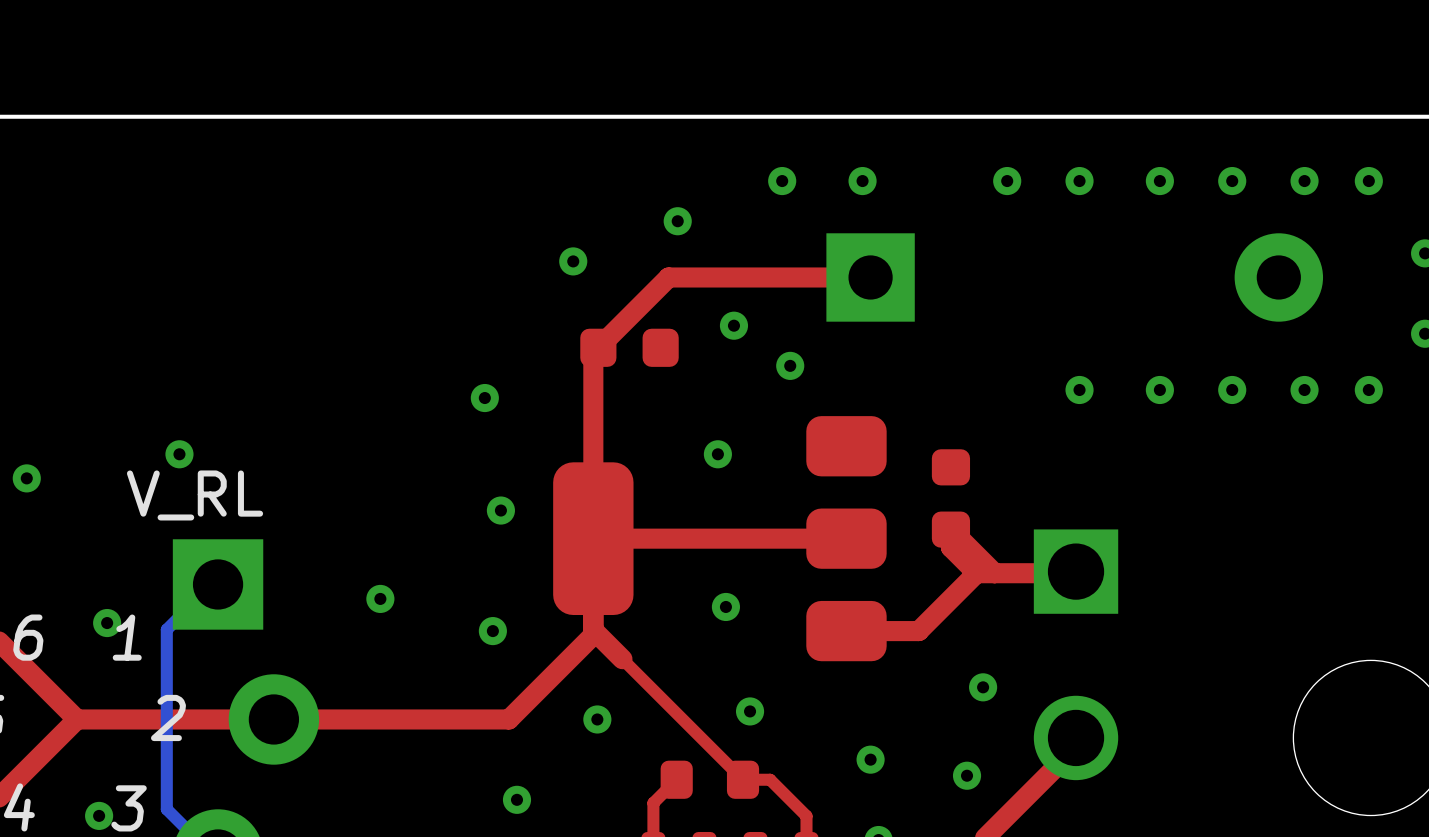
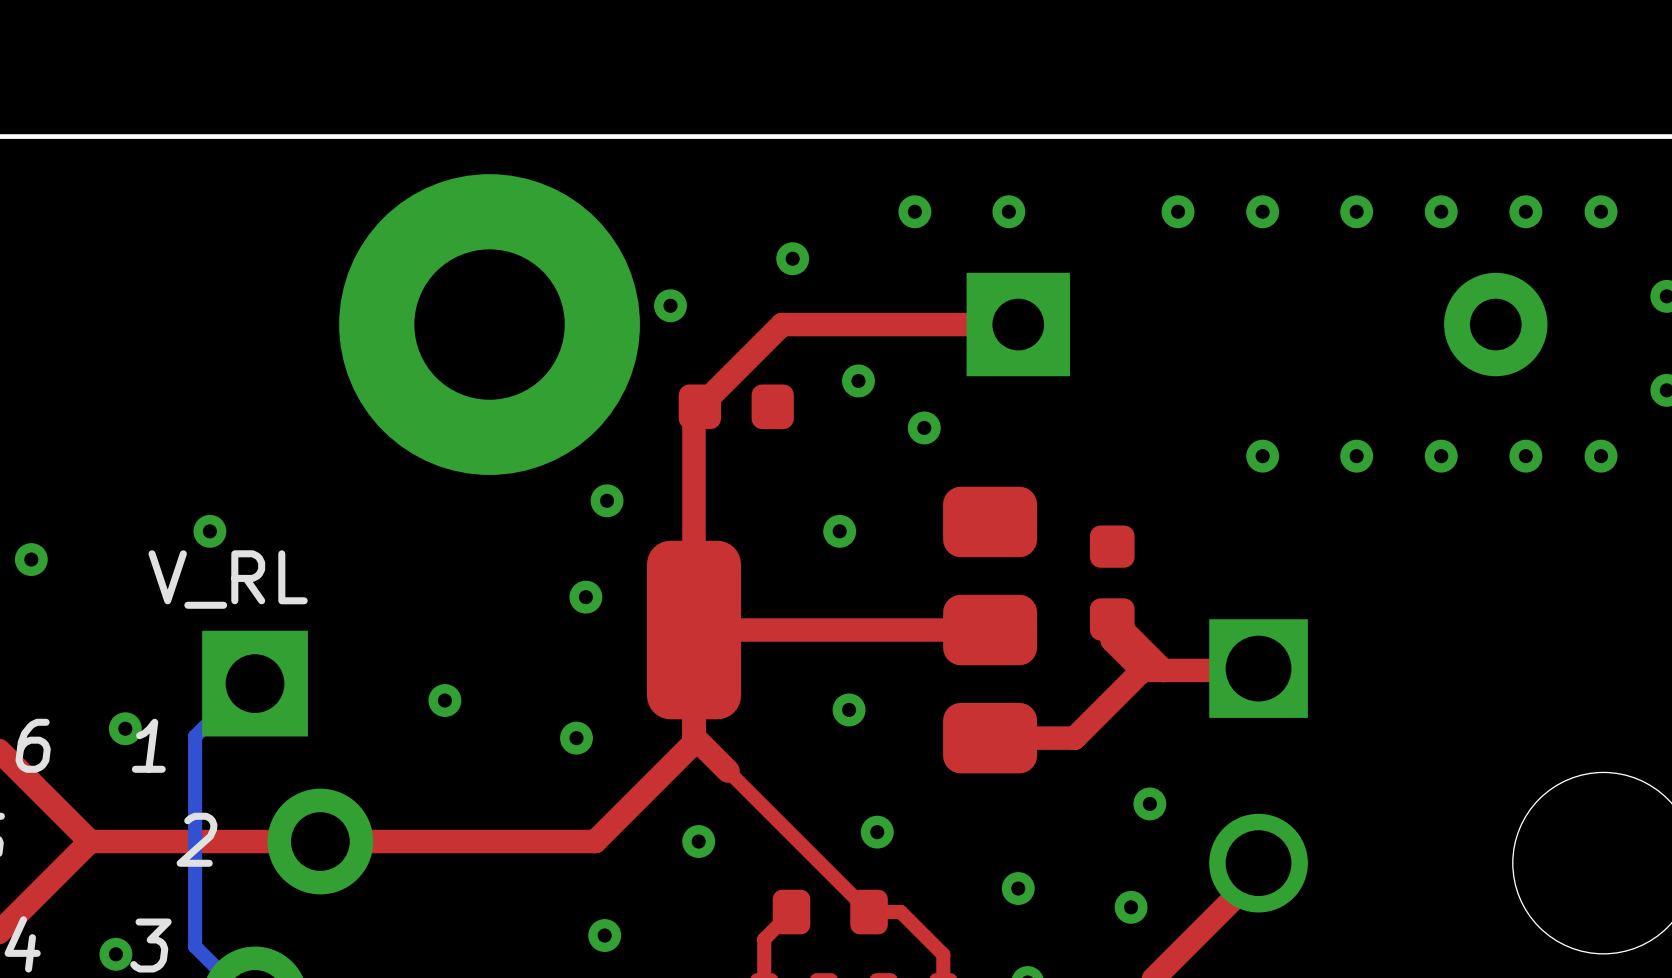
part: none -> (489, 324)
via position: (484, 398) -> (607, 500)

